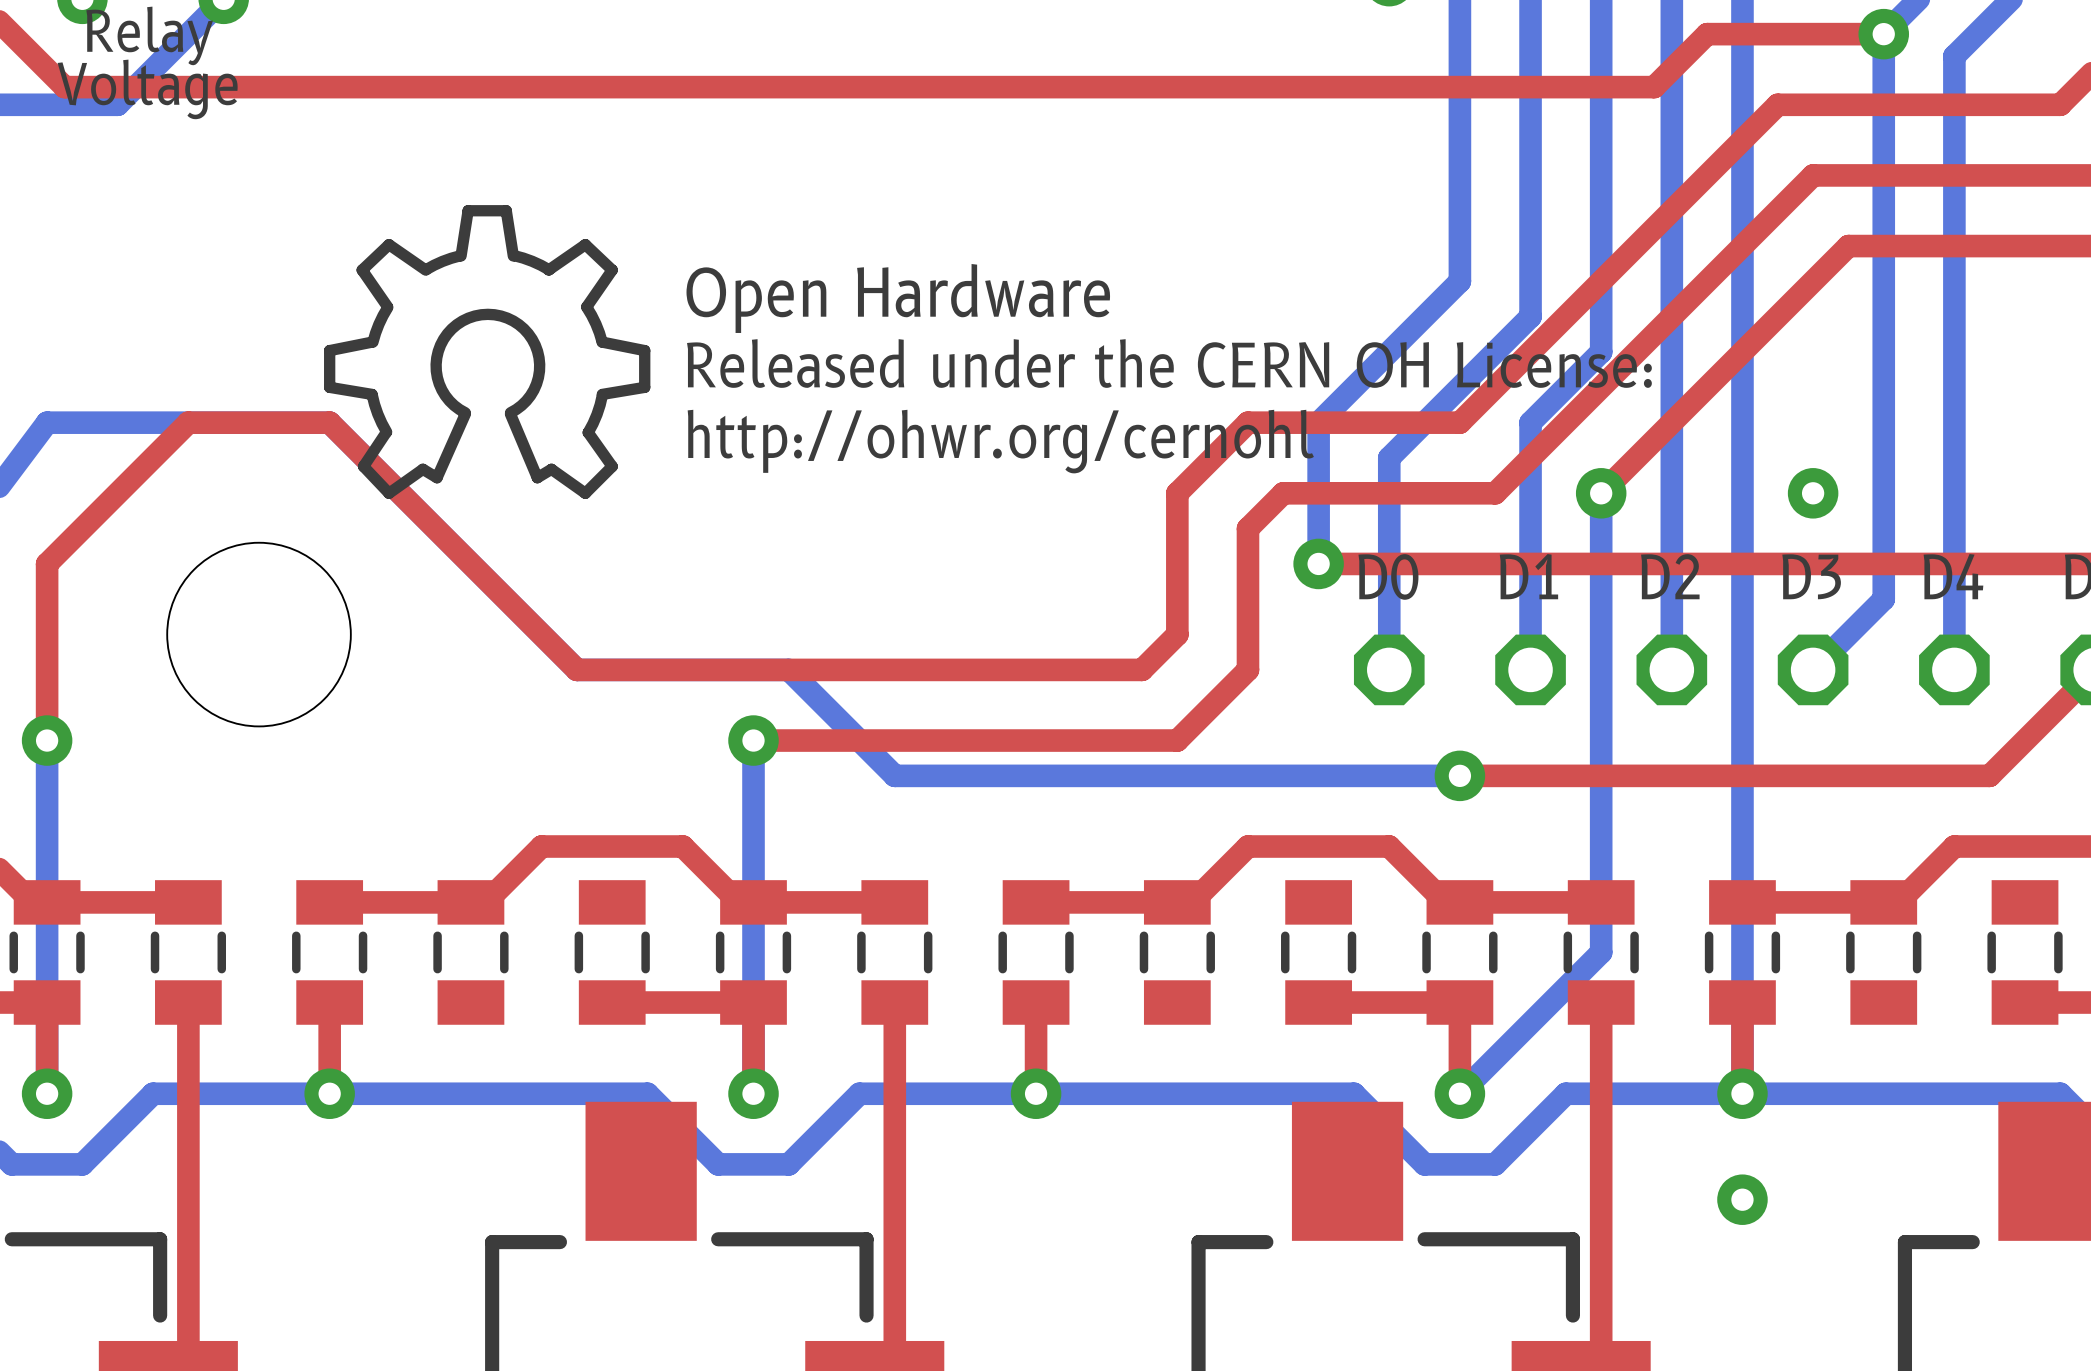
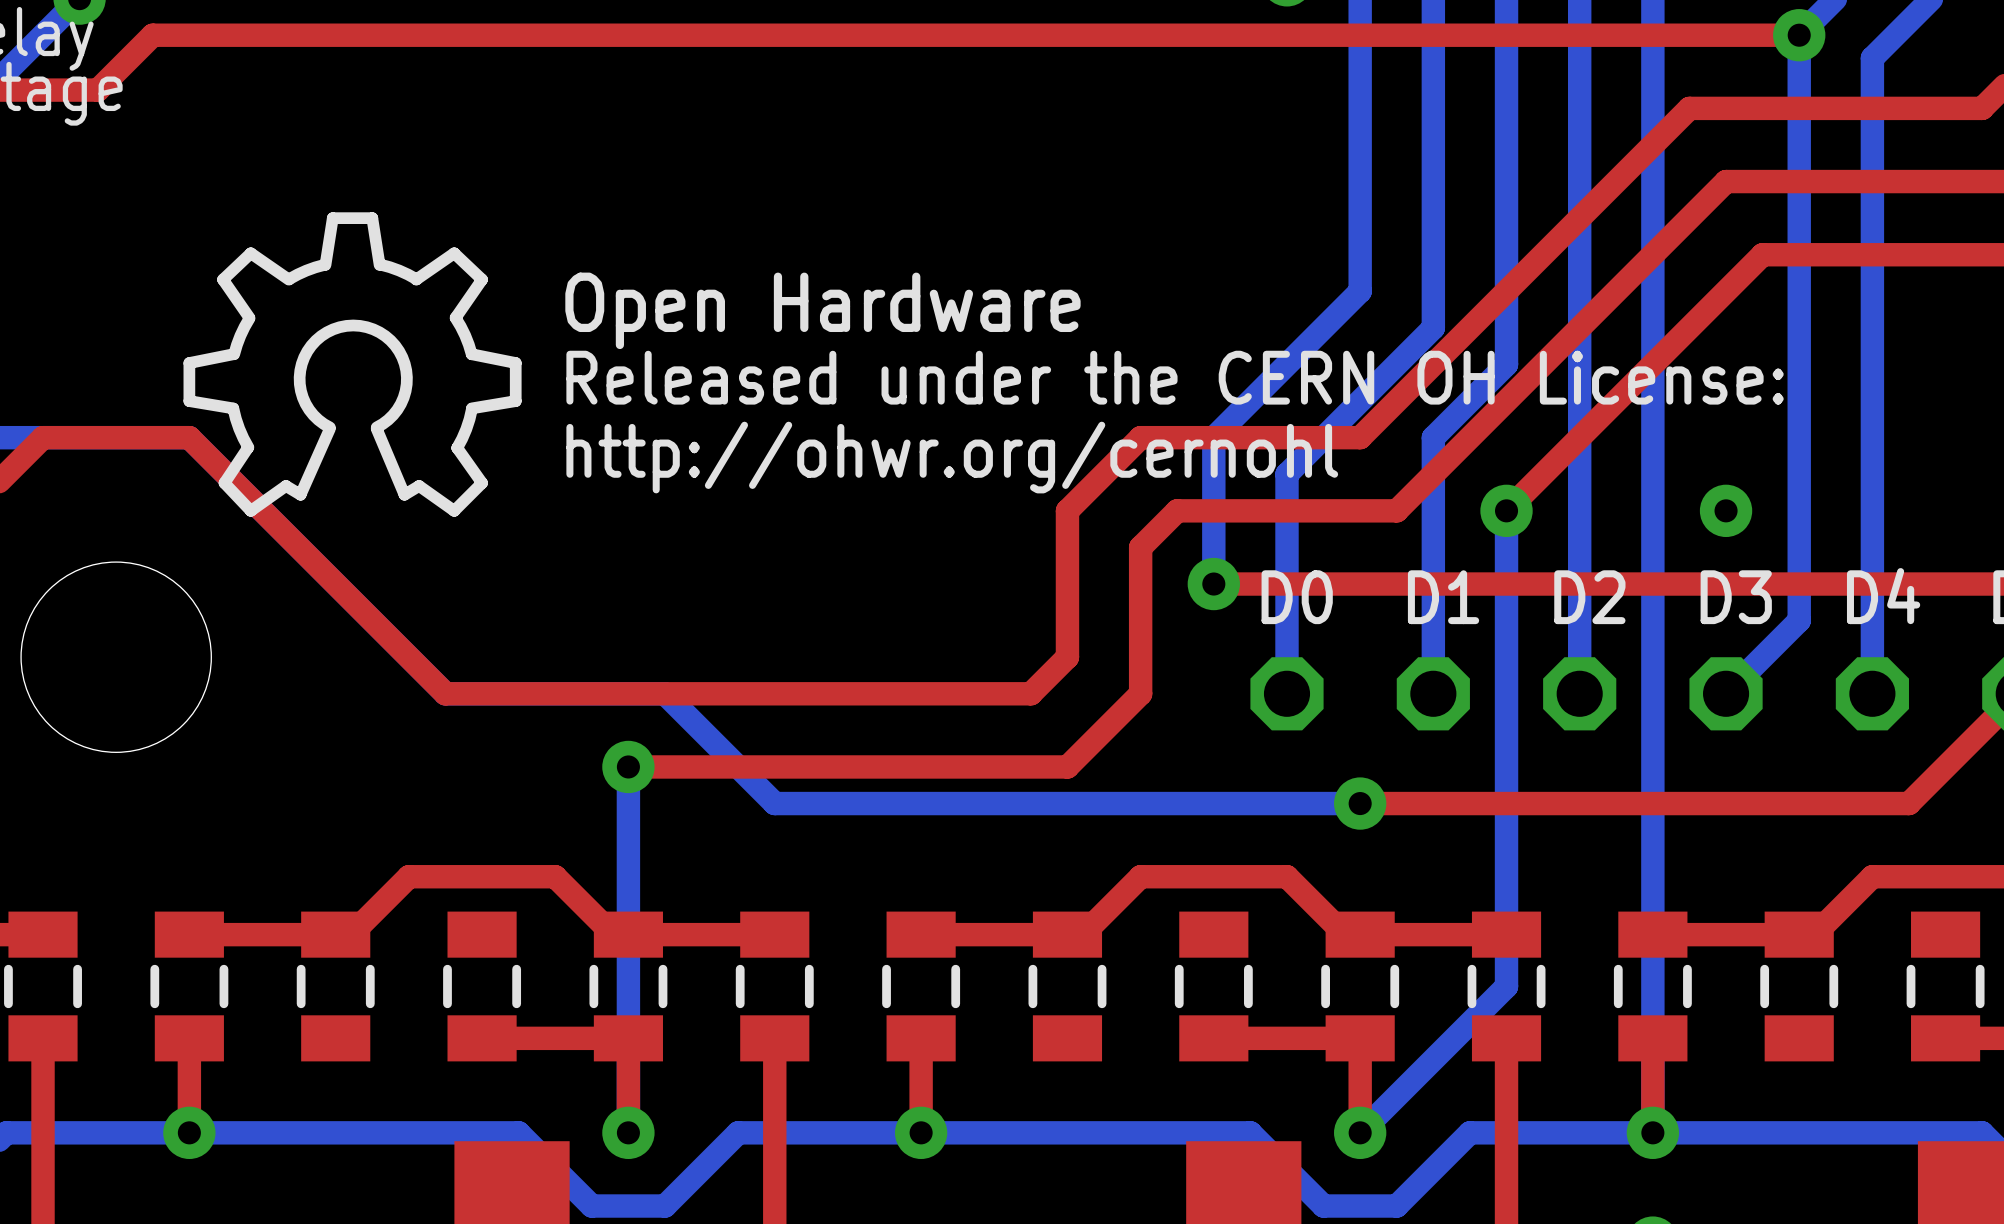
top track: (1707, 34) (1654, 87) (241, 87) -> (1616, 35) (152, 35) (97, 90)

